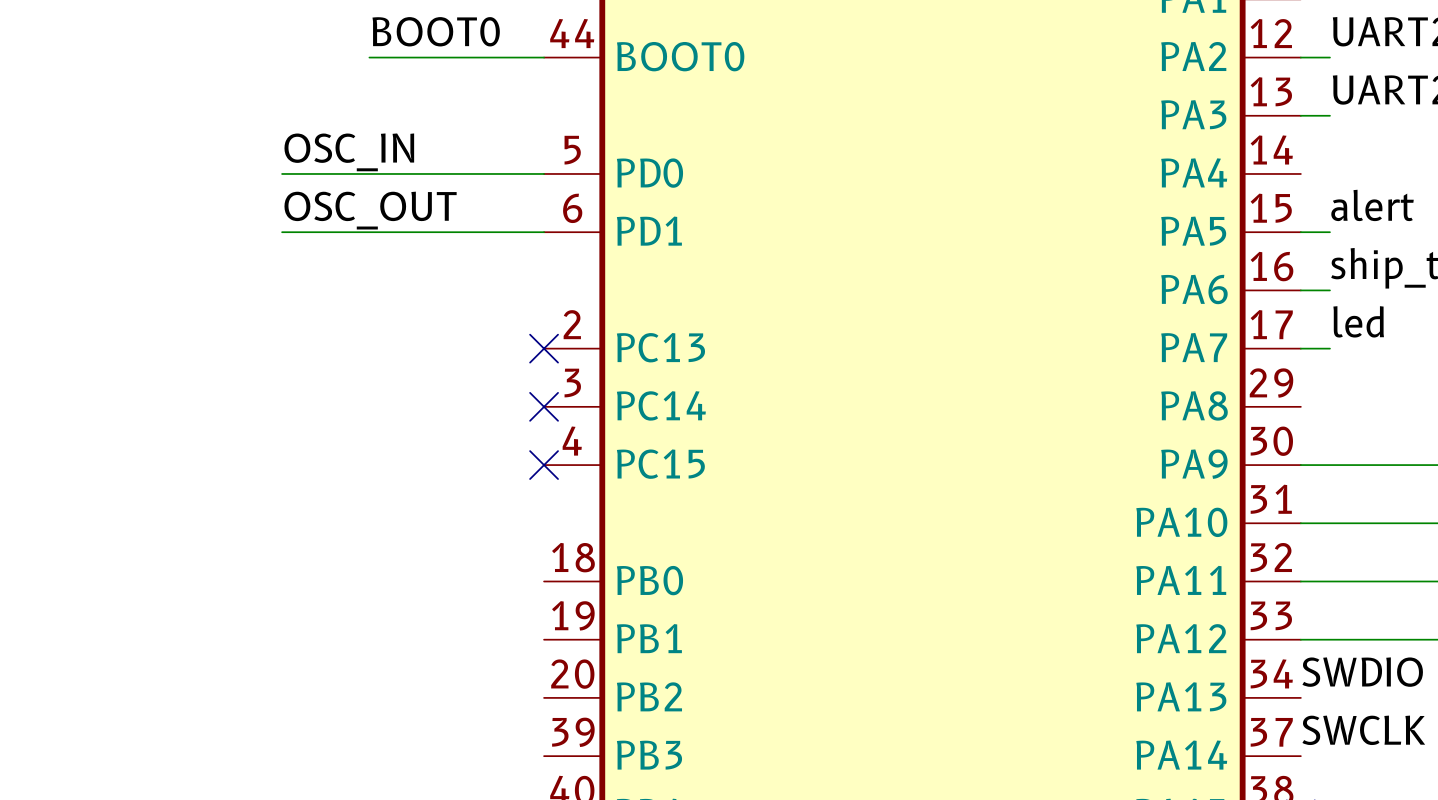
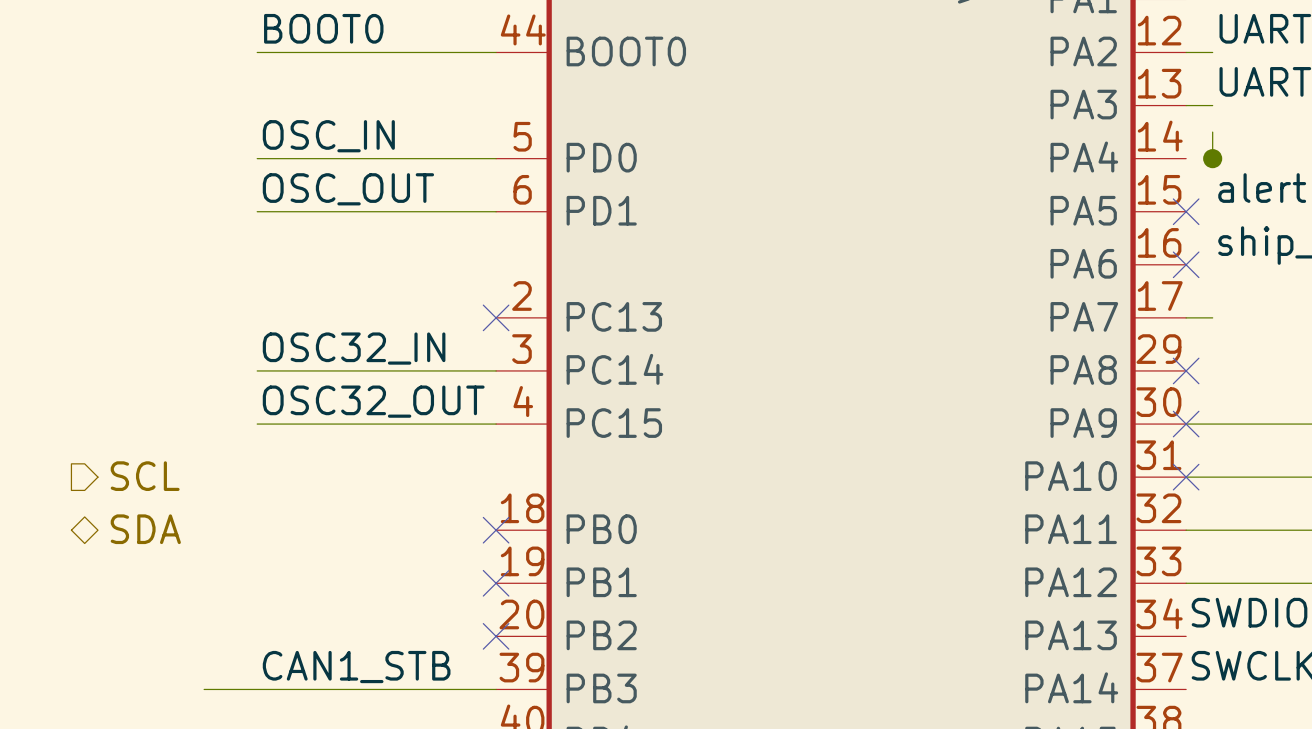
label position: BOOT0 (436, 31) -> BOOT0 (323, 28)
wire: none -> (257, 52) (336, 52)
wire: none -> (1212, 132) (1212, 158)
junction: none -> (1212, 158)
wire: (1300, 232) (1329, 232) -> none
no-connect mark: none -> (1186, 211)
wire: (1300, 290) (1329, 290) -> none
no-connect mark: none -> (1186, 264)
label: led (1358, 321) -> none
label: none -> OSC32_IN (354, 348)
wire: none -> (257, 370) (496, 370)
no-connect mark: (544, 406) -> none
no-connect mark: none -> (1186, 370)
label: none -> OSC32_OUT (373, 401)
wire: none -> (257, 424) (496, 424)
no-connect mark: (544, 465) -> none
no-connect mark: none -> (1186, 424)
hierarchical label: none -> SCL (145, 476)
no-connect mark: none -> (1186, 477)
hierarchical label: none -> SDA (145, 529)
no-connect mark: none -> (496, 530)
no-connect mark: none -> (496, 583)
no-connect mark: none -> (496, 636)
label: none -> CAN1_STB (356, 667)
wire: none -> (204, 689) (496, 689)

